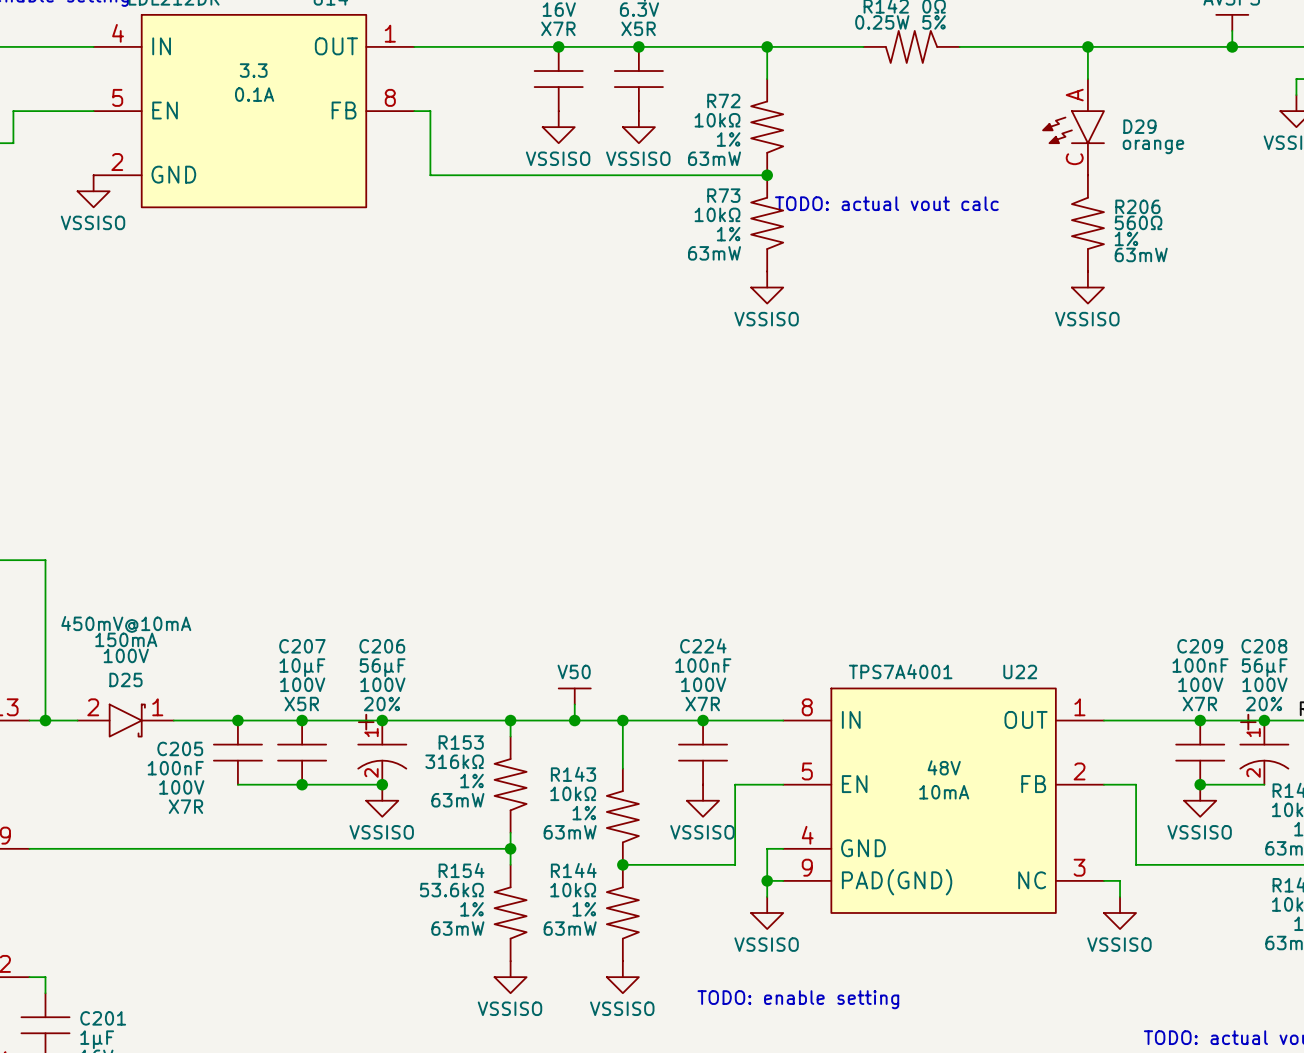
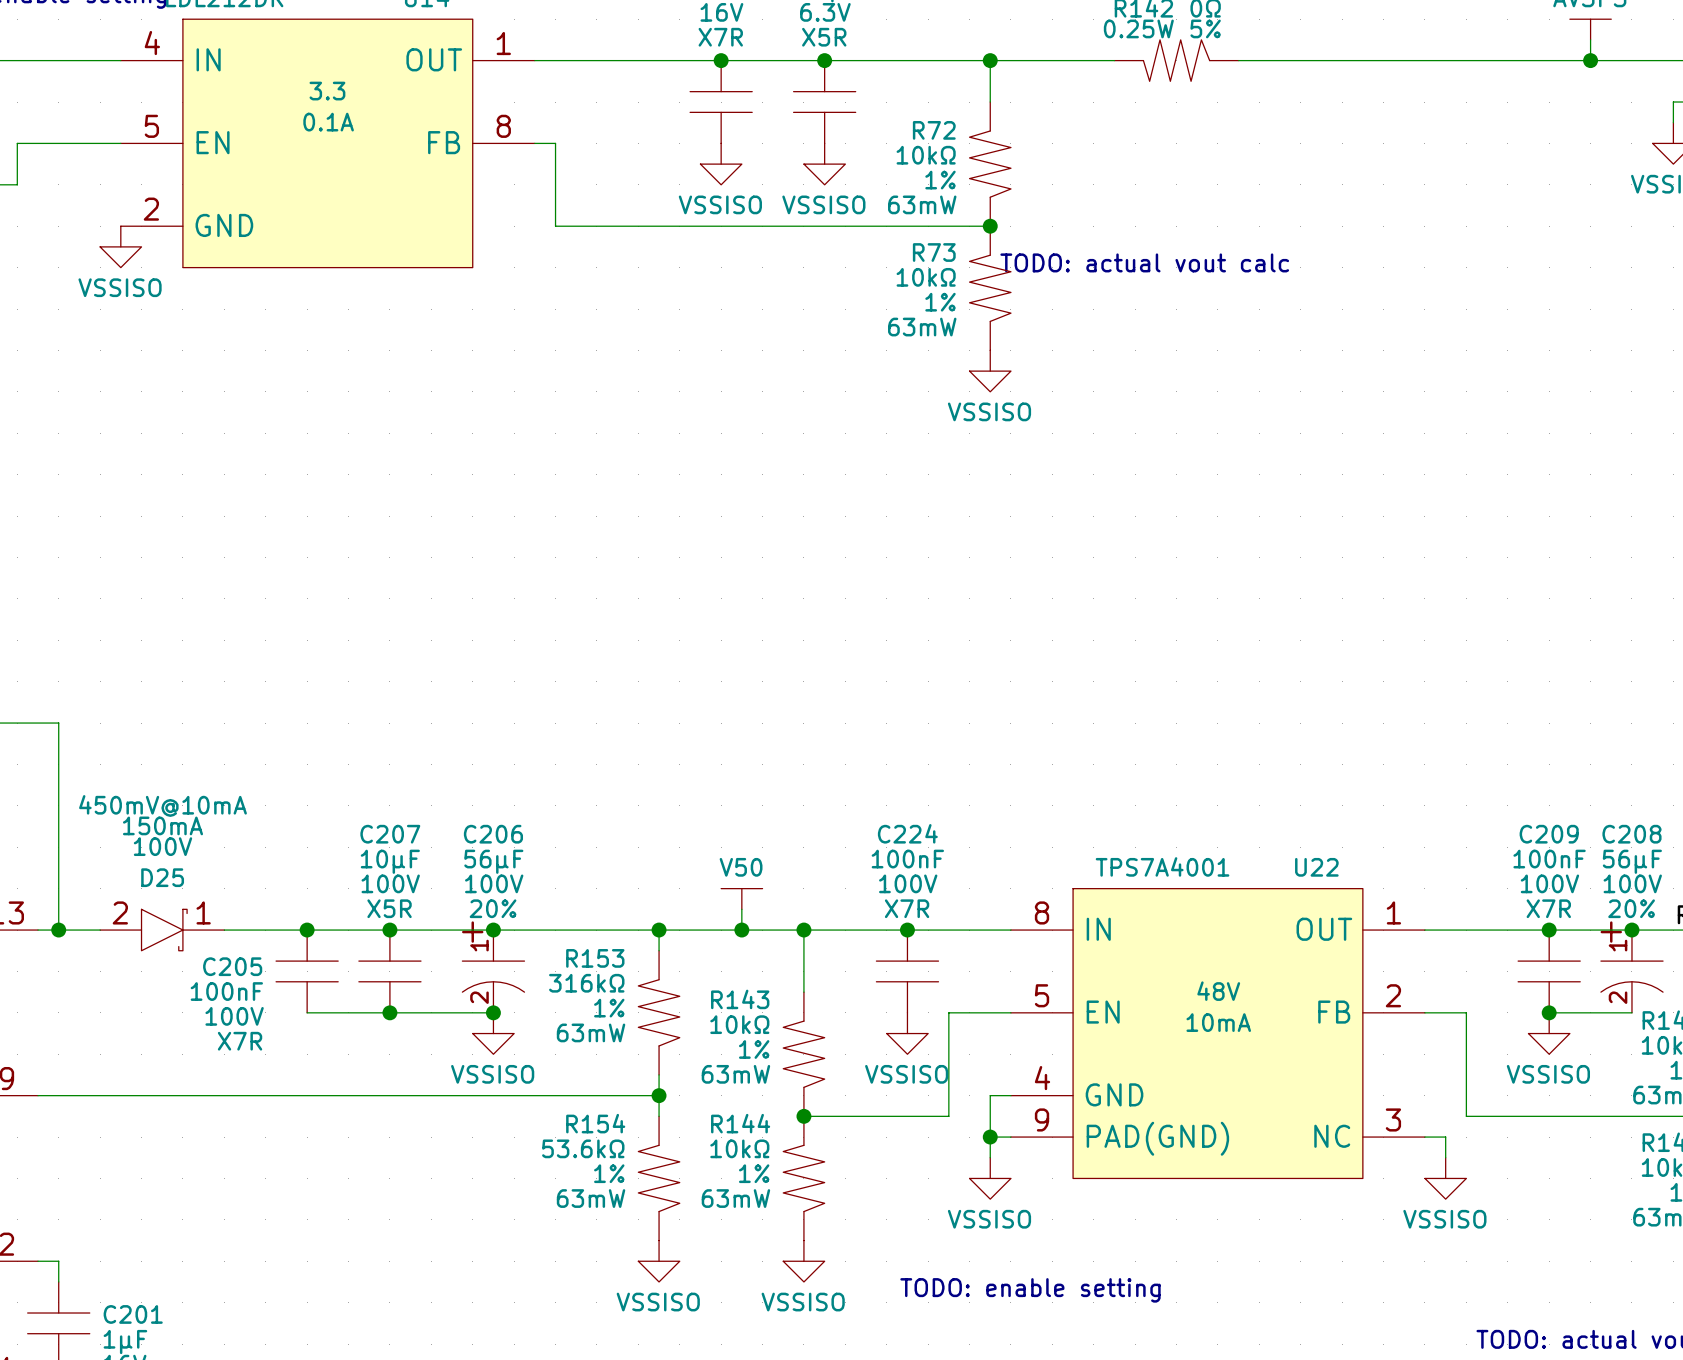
wire: (1087, 46) (1087, 79) -> none
junction: (1087, 46) -> none
D29: orange (1073, 127) -> none
R206: (1087, 223) -> none
power symbol: VSSISO (1087, 287) -> none

